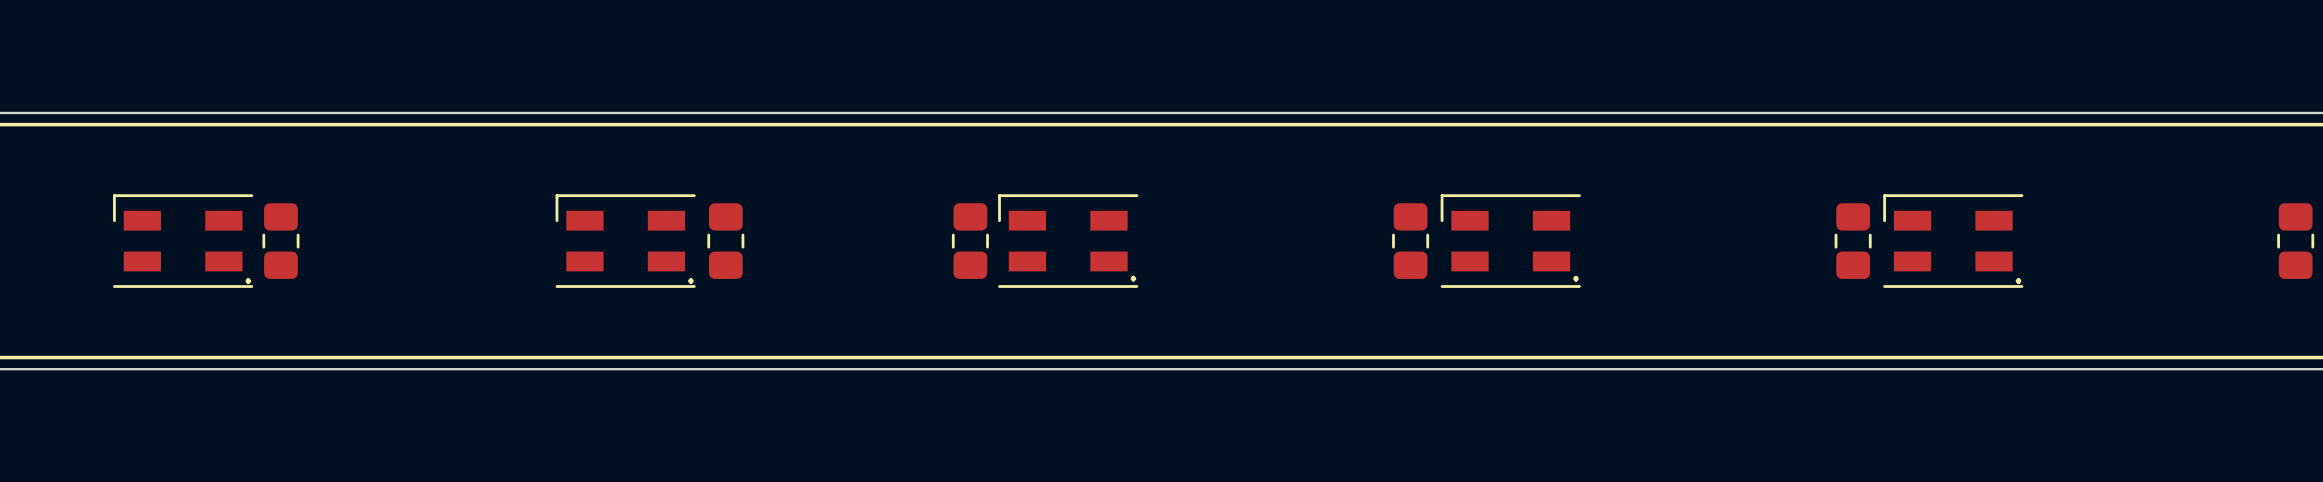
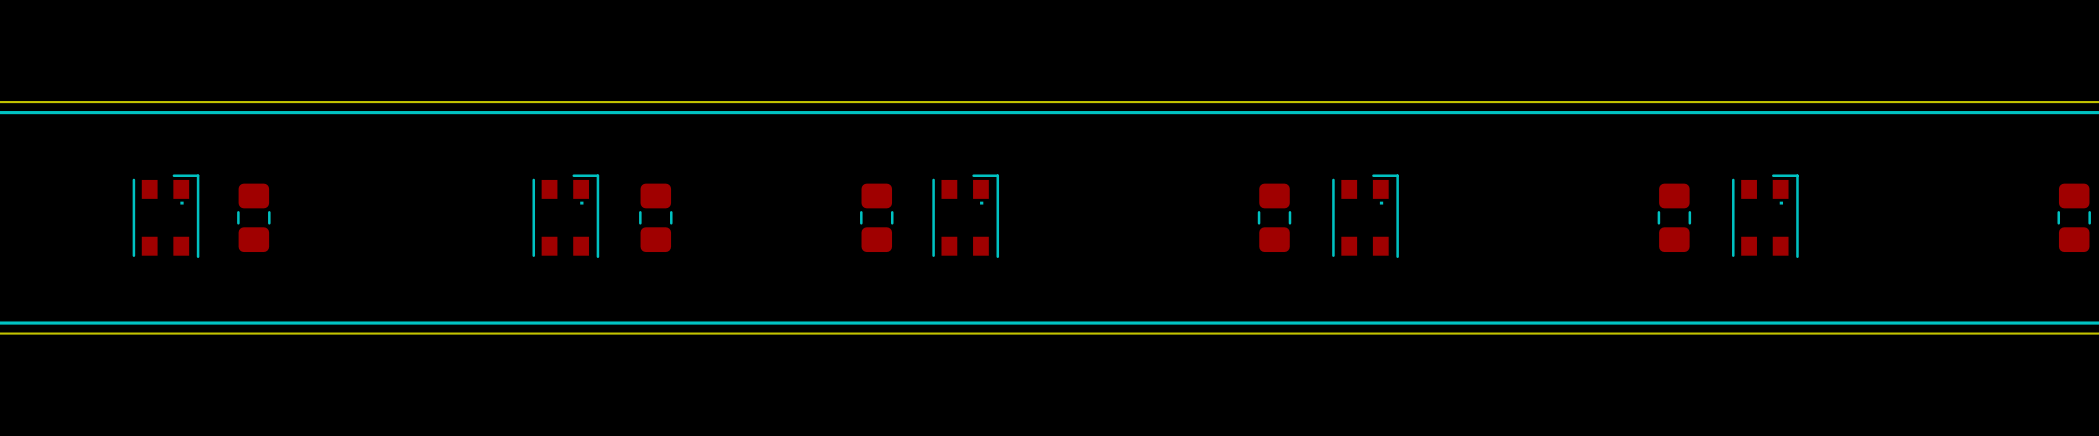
part footprint: [113, 194, 254, 288] -> [132, 174, 200, 259]
part footprint: [555, 194, 696, 288] -> [532, 174, 600, 259]
part footprint: [998, 194, 1139, 288] -> [932, 174, 1000, 259]
part footprint: [1440, 194, 1581, 288] -> [1332, 174, 1399, 259]
part footprint: [1883, 194, 2024, 288] -> [1732, 174, 1799, 259]

